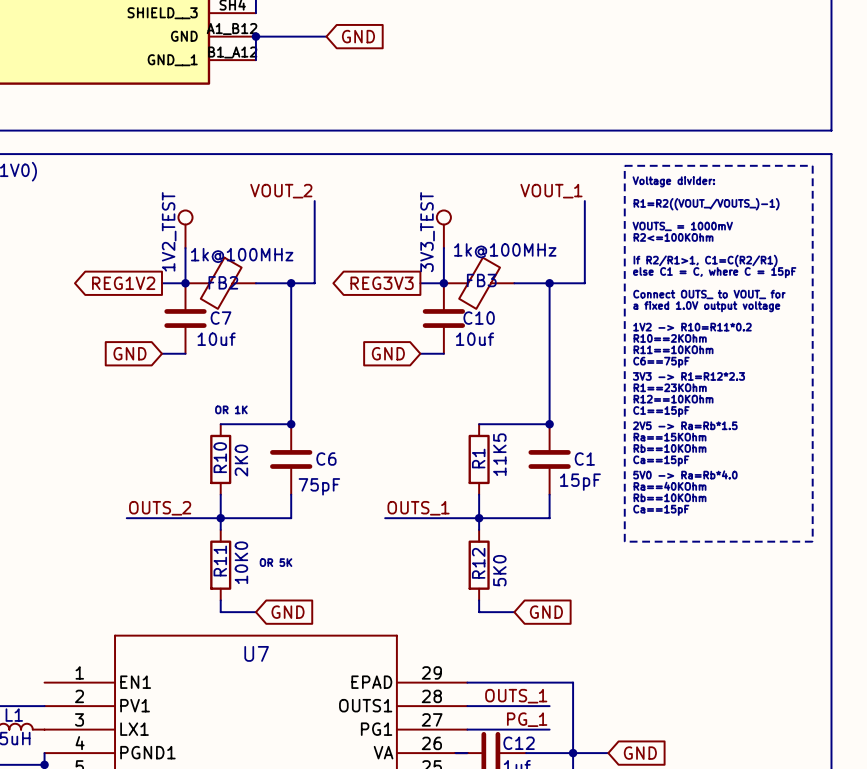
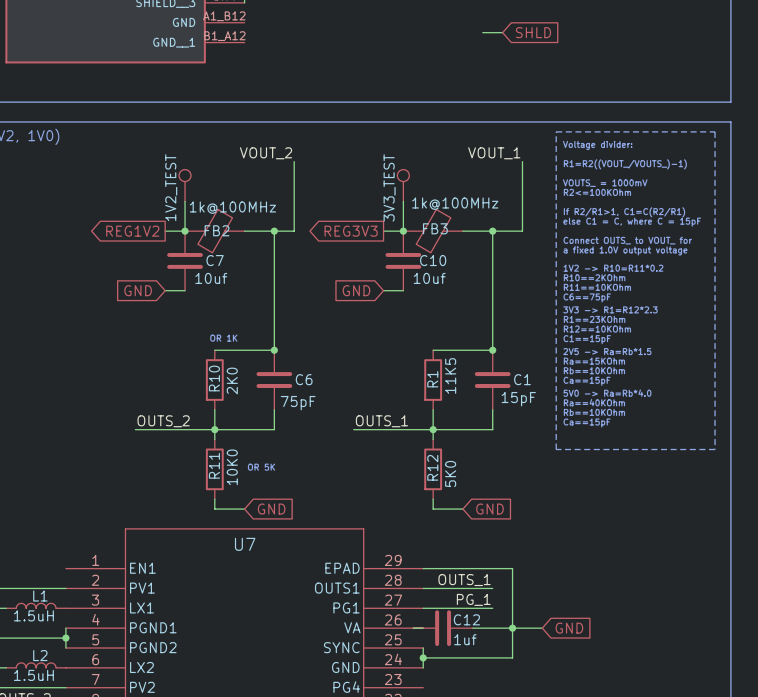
junction: (255, 36) -> none
wire: (326, 36) (255, 36) (255, 60) -> none
global label: GND (358, 36) -> none
wire: none -> (482, 32) (502, 32)
global label: none -> SHLD (533, 32)

